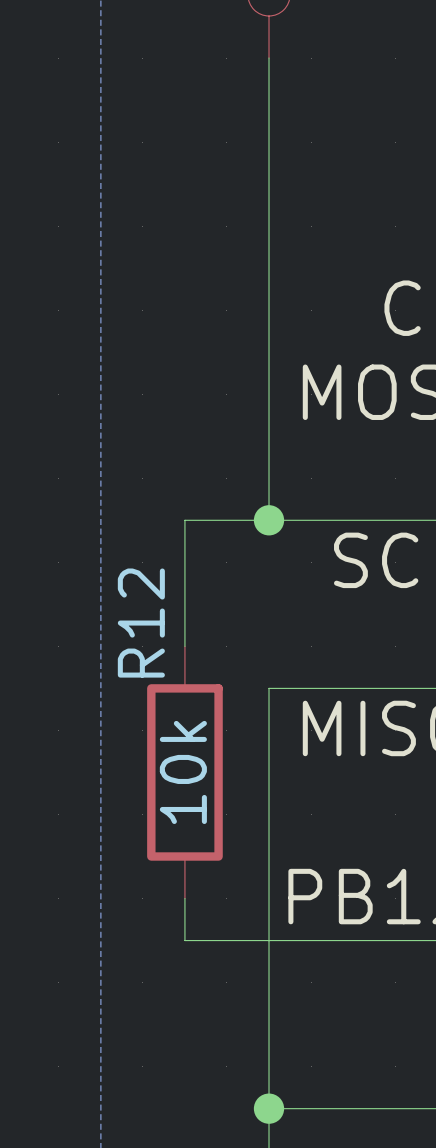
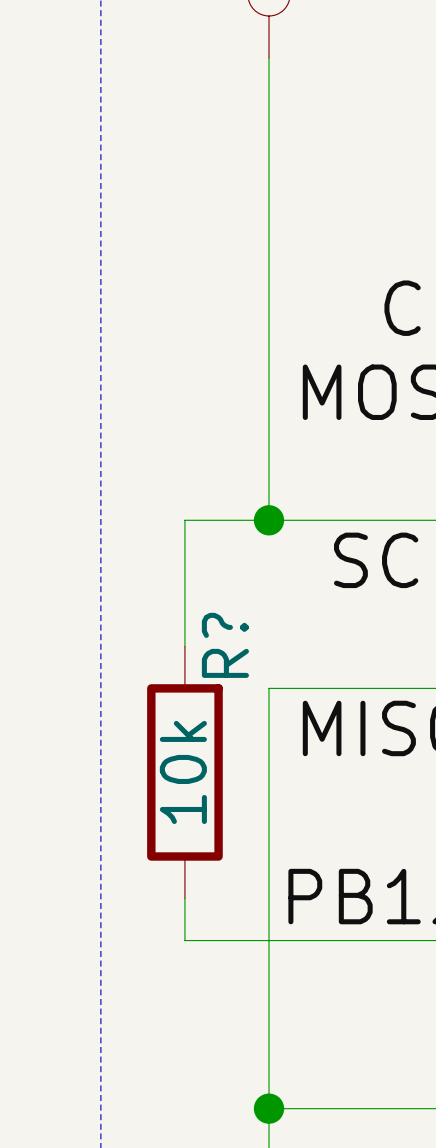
R12 name: R12 (141, 623) -> R? (225, 645)

